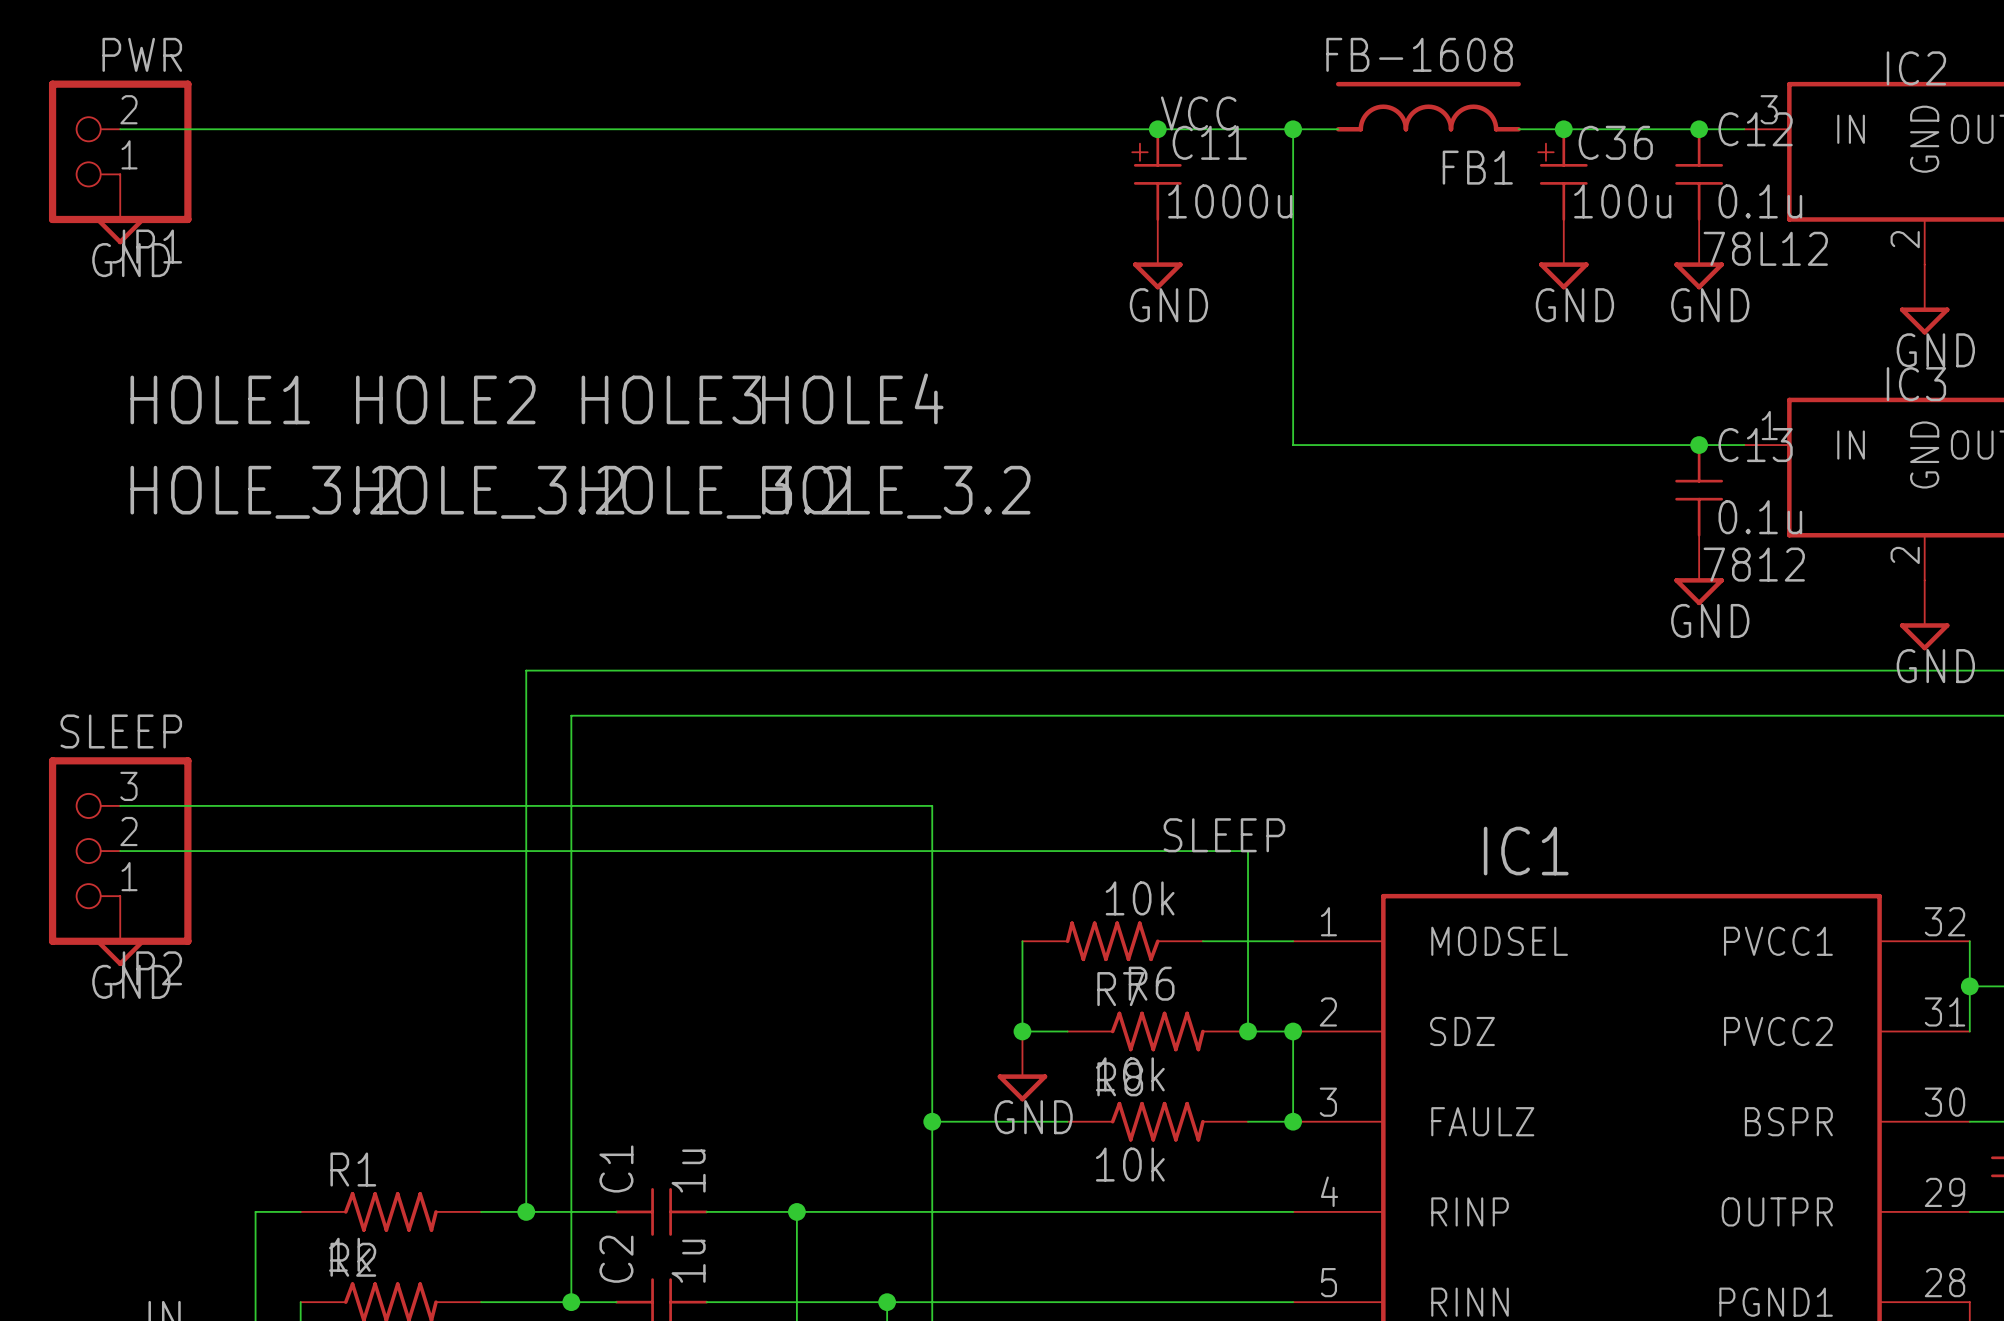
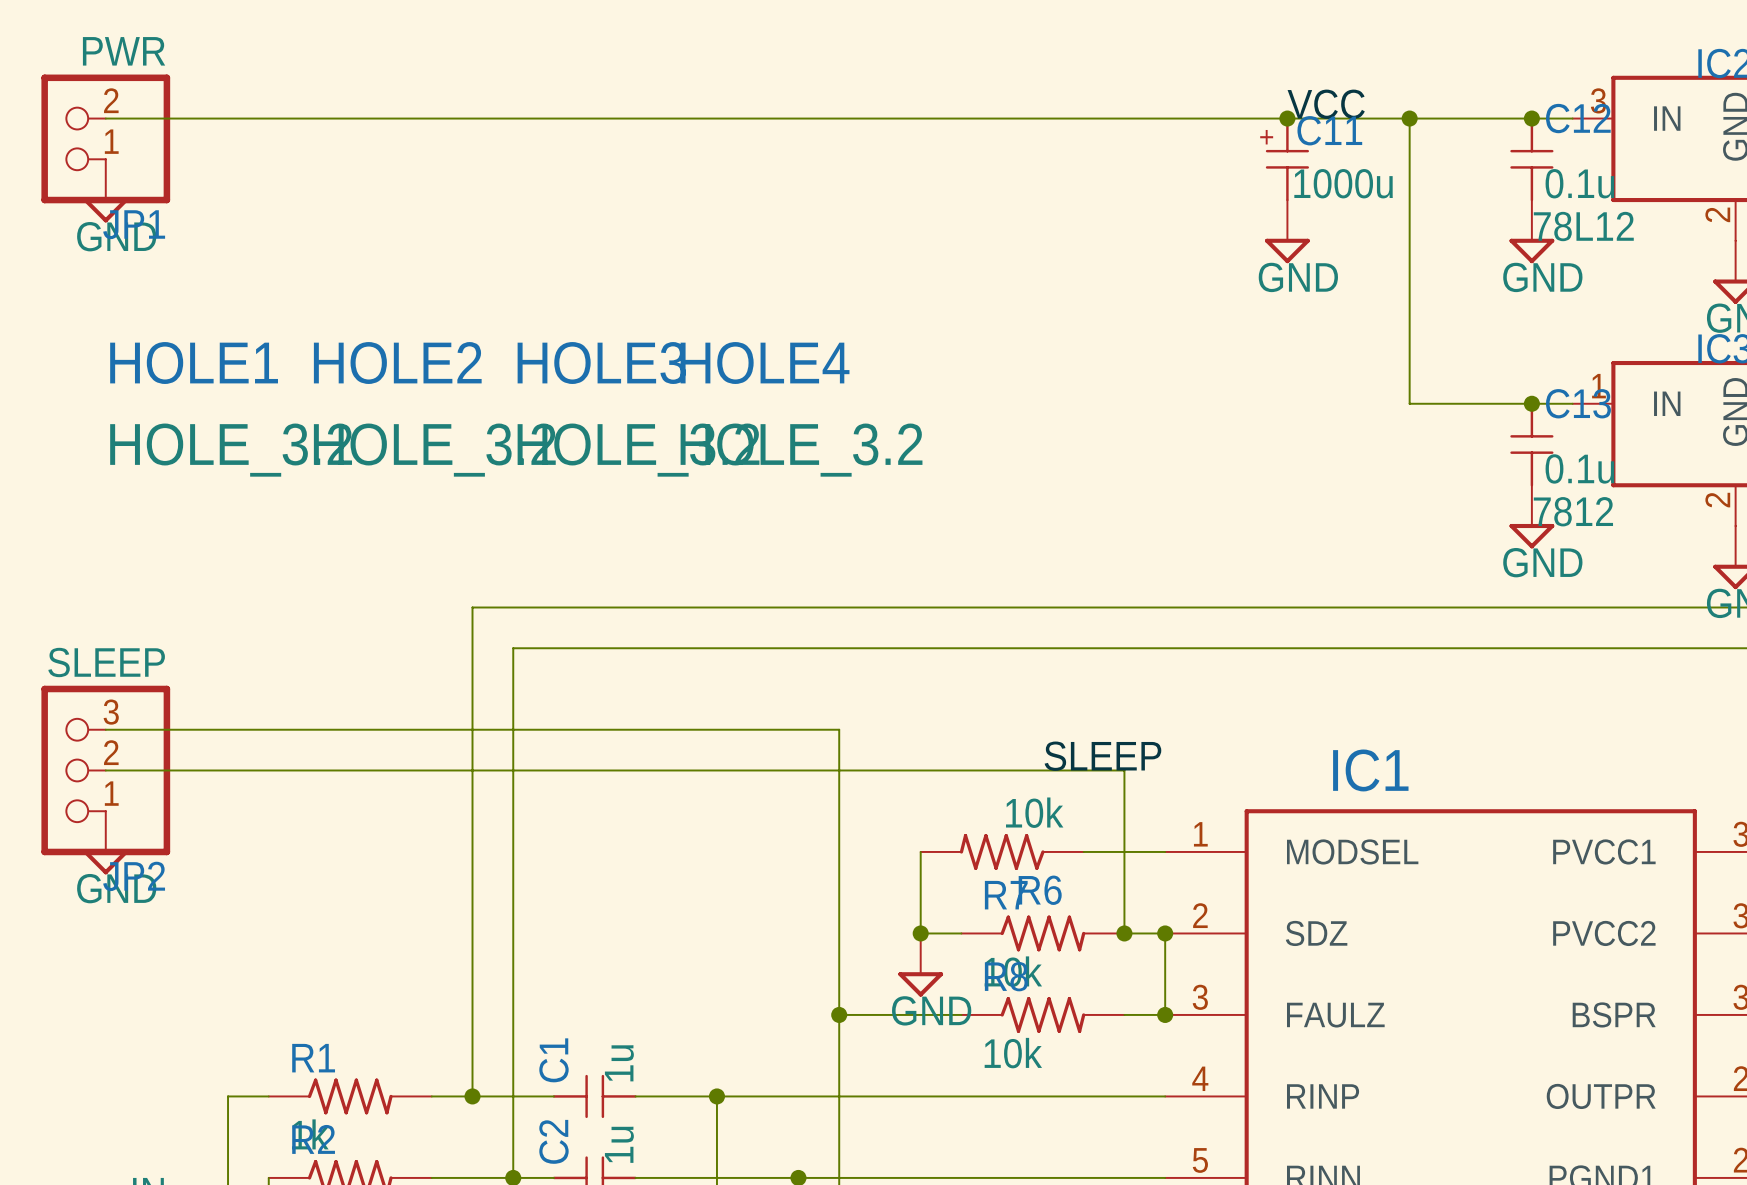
FB1: FB-1608 (1428, 106) -> none
label position: VCC (1198, 113) -> VCC (1326, 104)
junction: (1157, 129) -> none
wire: (1293, 129) (1293, 445) (1563, 445) -> (1409, 118) (1409, 403)
junction: (1293, 129) -> none
wire: none -> (1205, 118) (1368, 118)
junction: none -> (1287, 118)
C11 position: (1157, 174) -> (1287, 159)
C36: 100u (1563, 174) -> none
power symbol: GND (1157, 254) -> none
power symbol: none -> GND (1287, 231)
power symbol: GND (1563, 254) -> none

